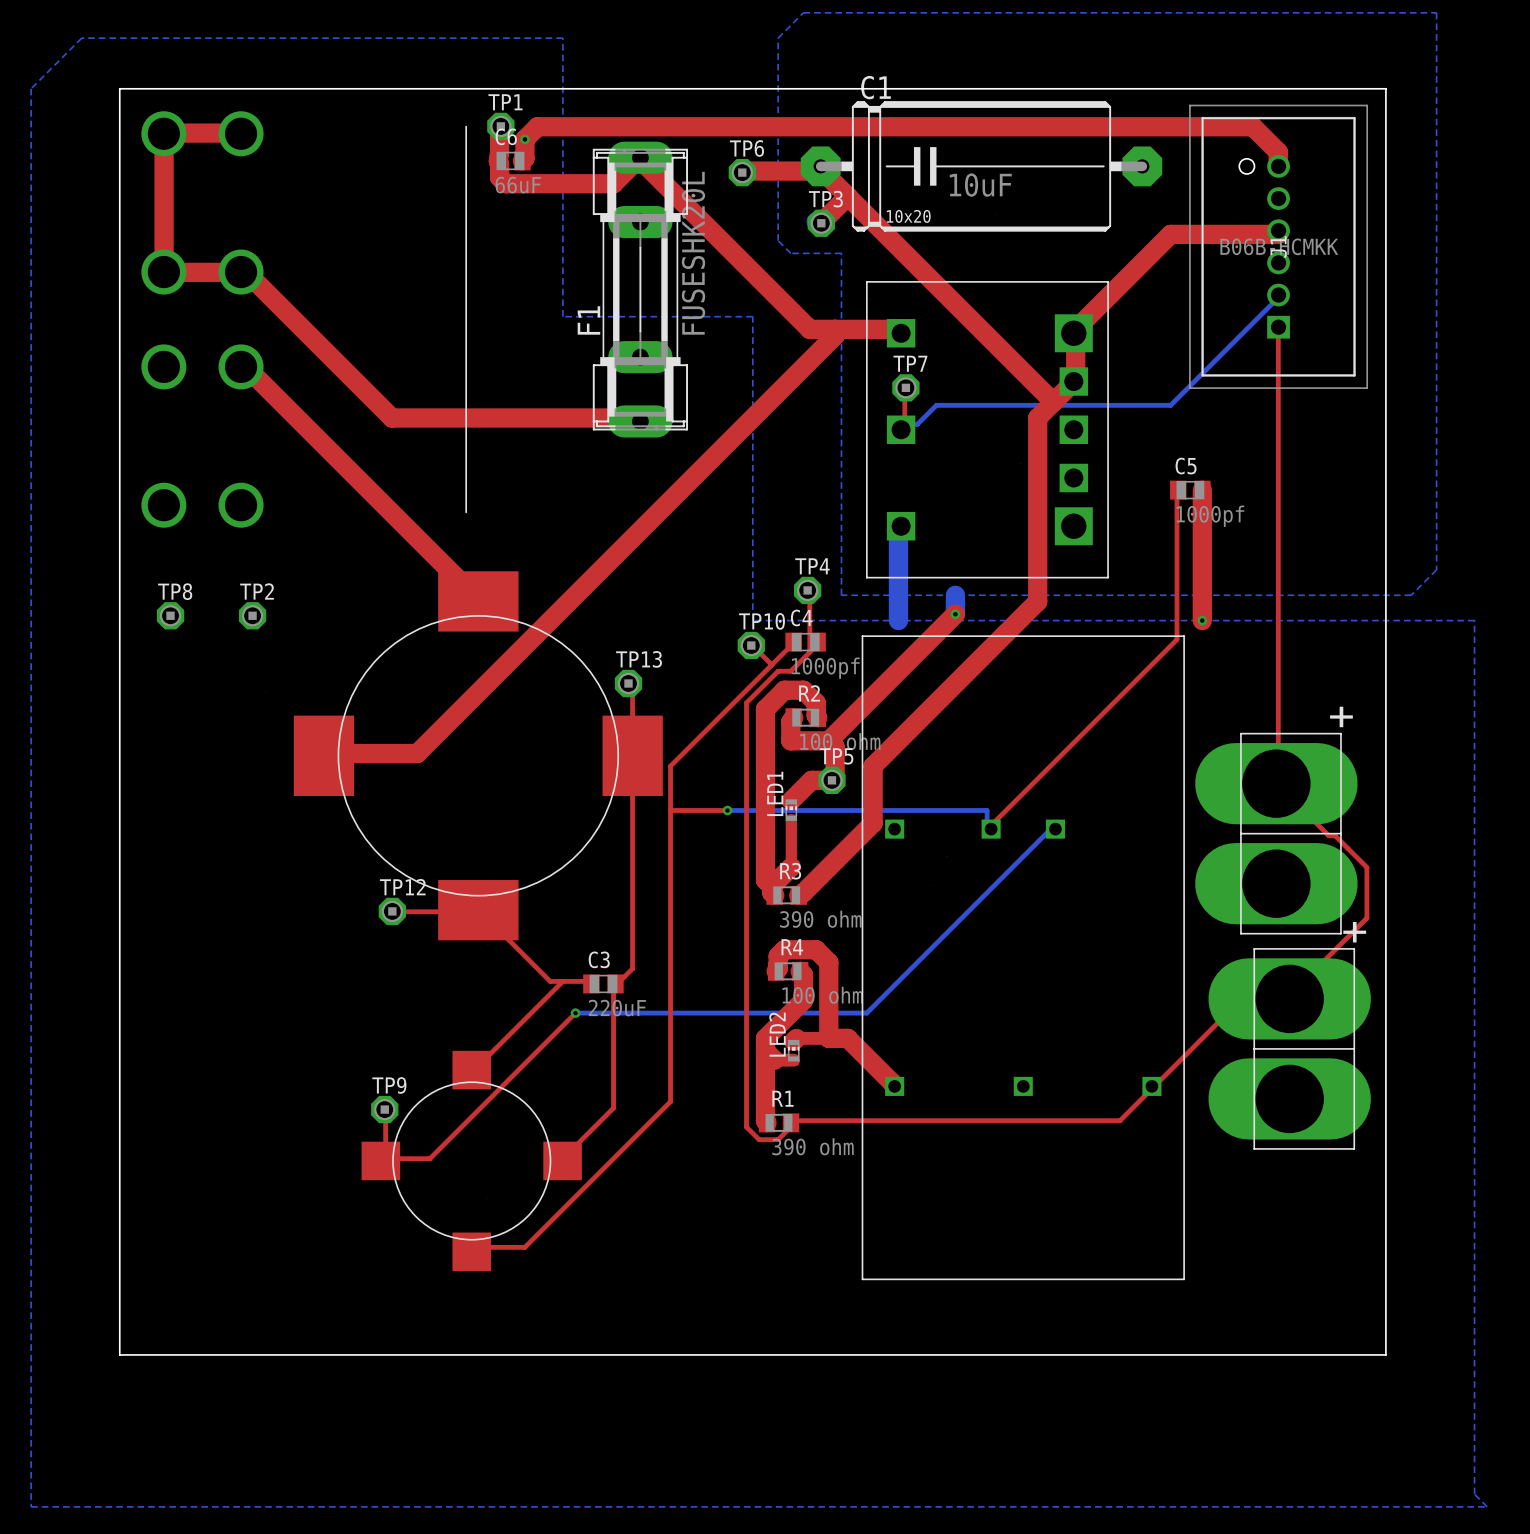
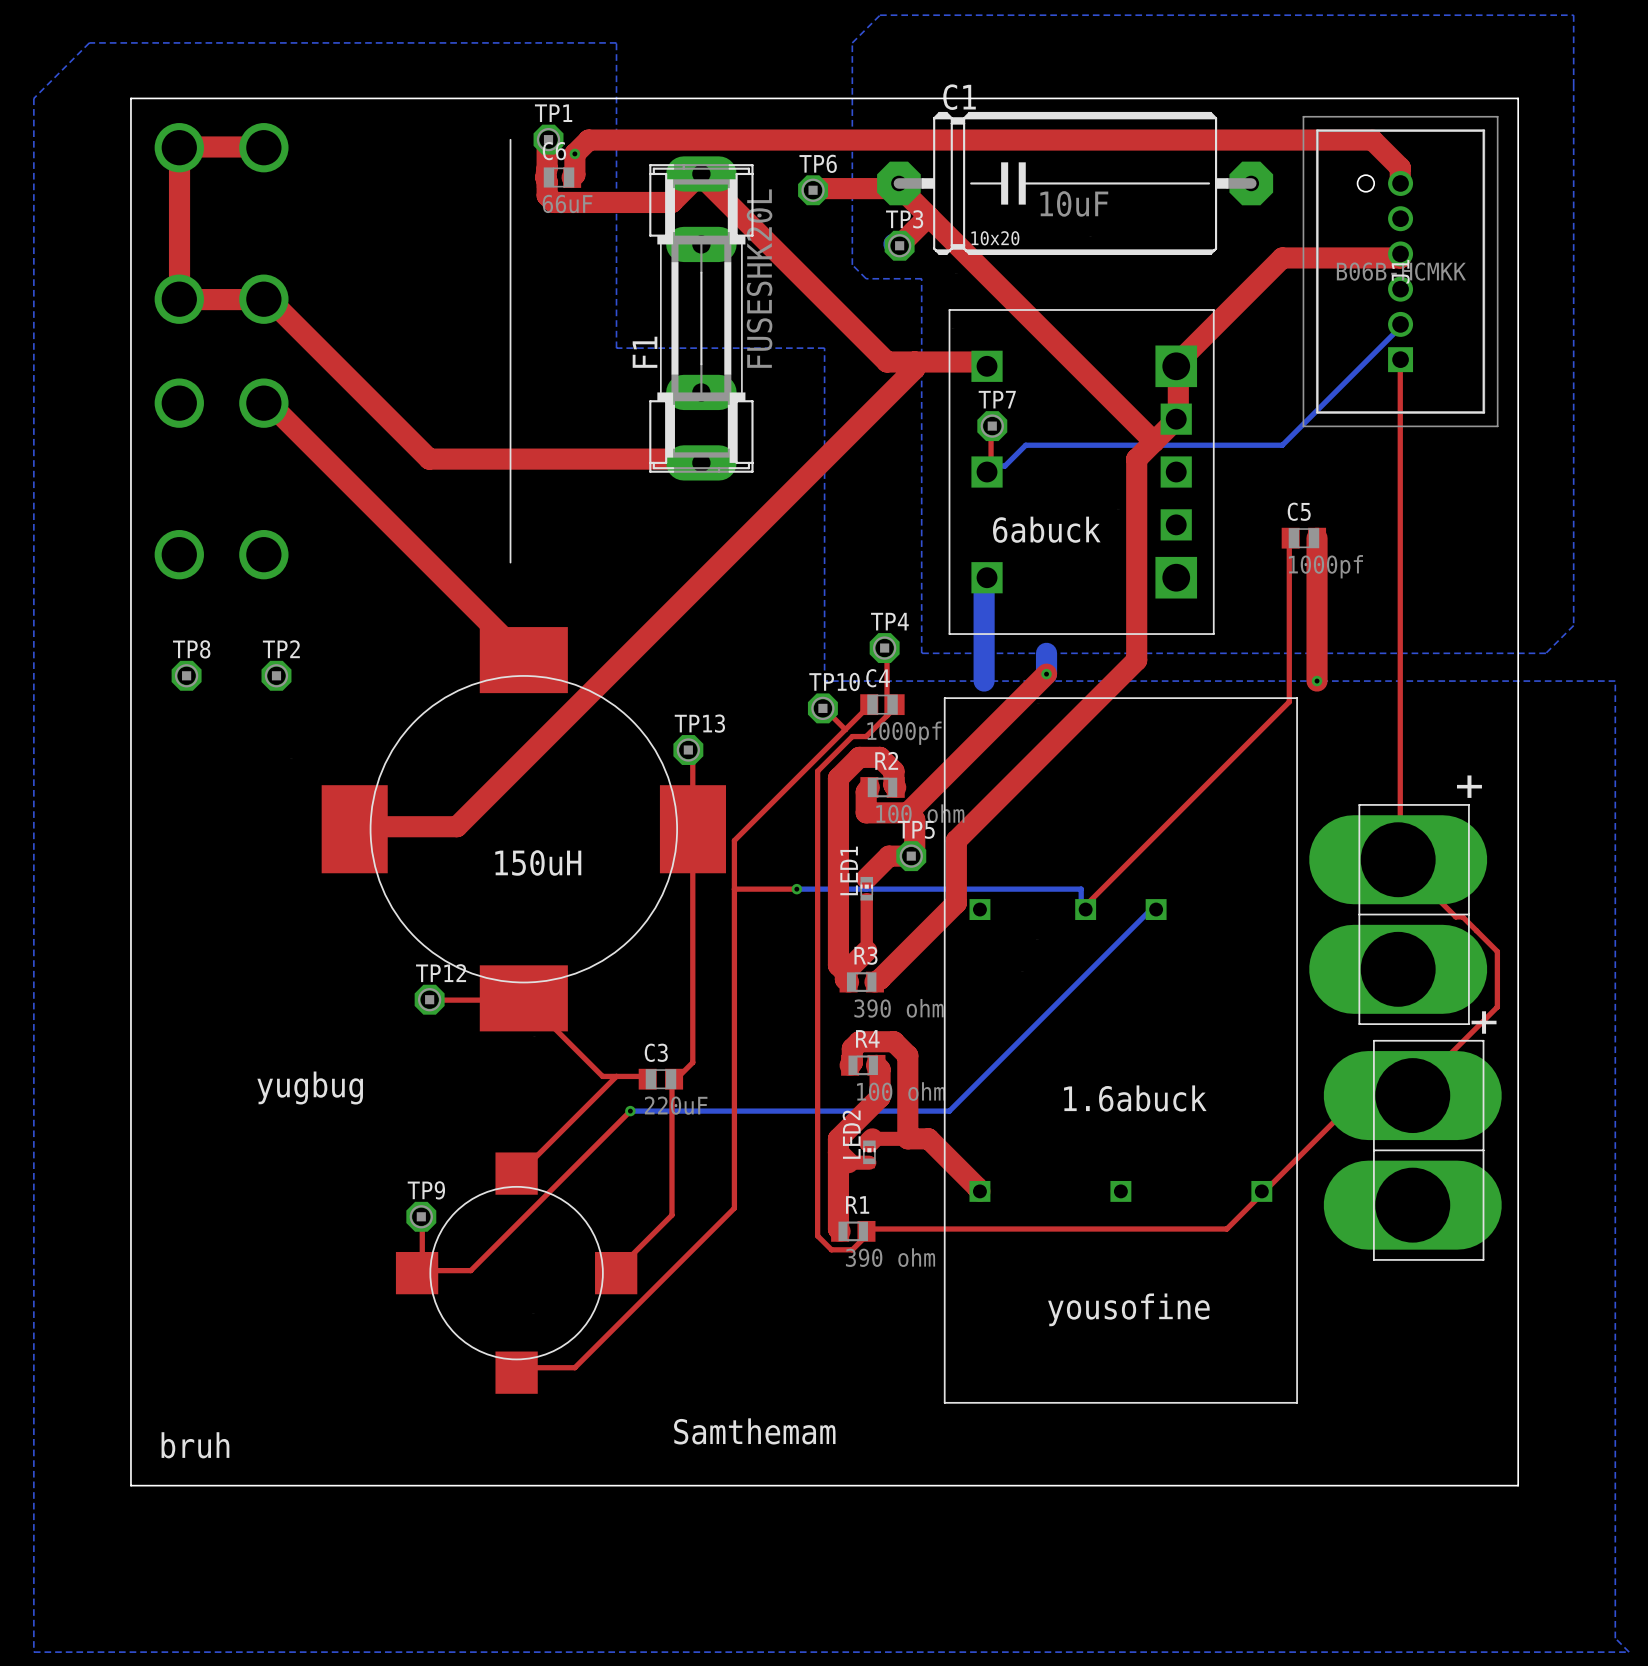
text: none -> 6abuck (1046, 529)
text: none -> 150uH (538, 862)
text: none -> yugbug (310, 1088)
text: none -> 1.6abuck (1135, 1098)
text: none -> yousofine (1128, 1309)
text: none -> Samthemam (754, 1431)
text: none -> bruh (195, 1445)

